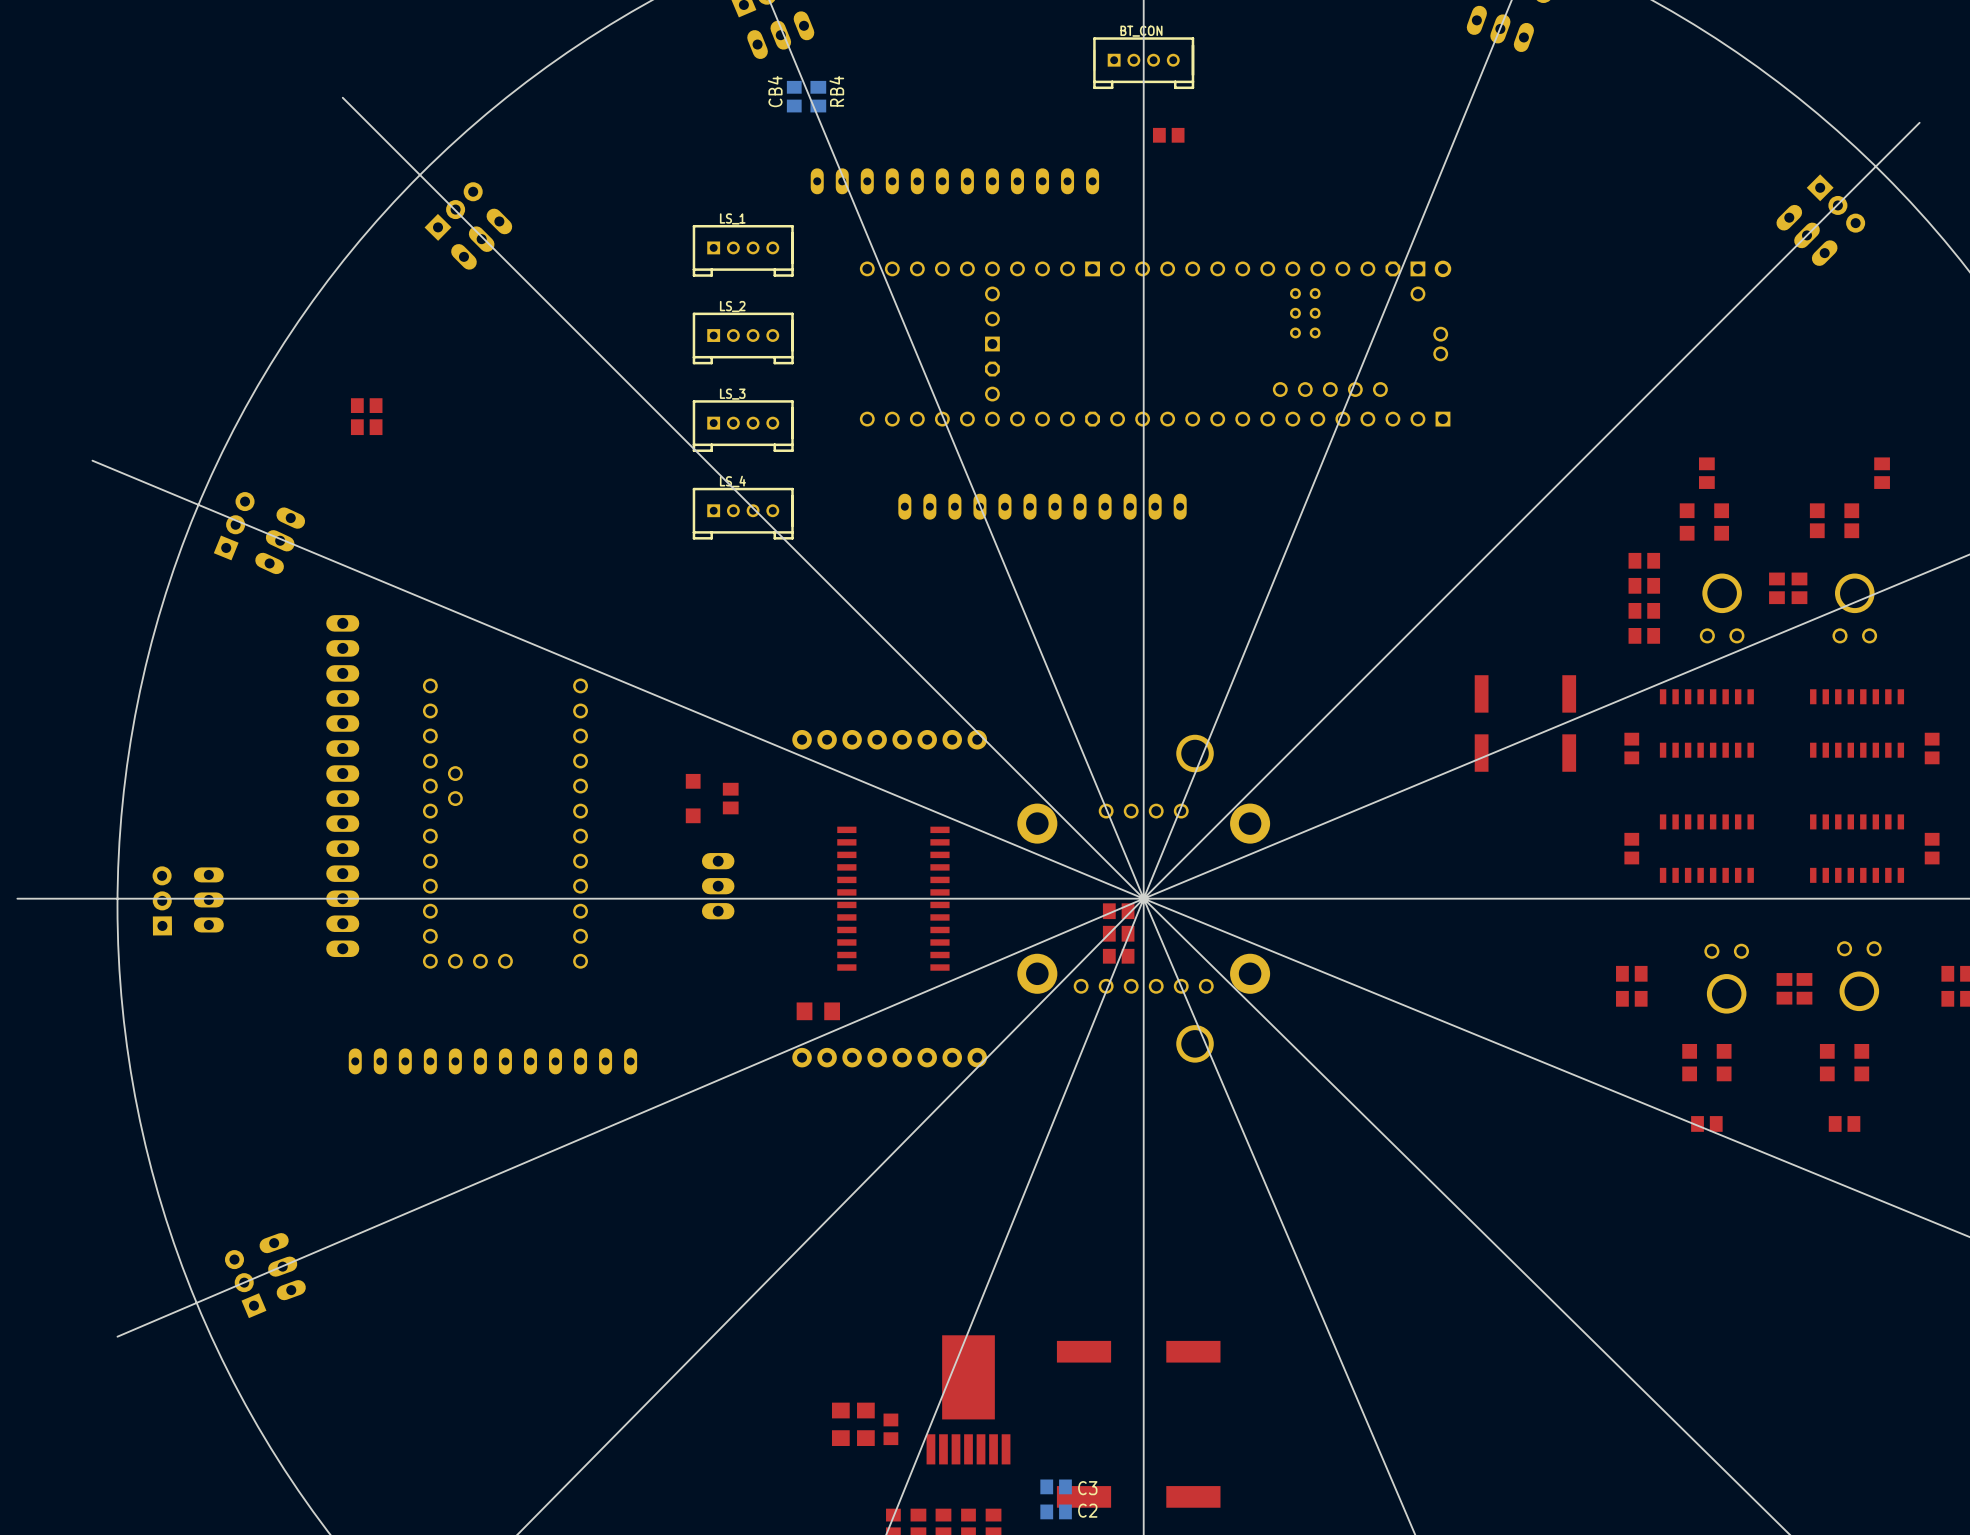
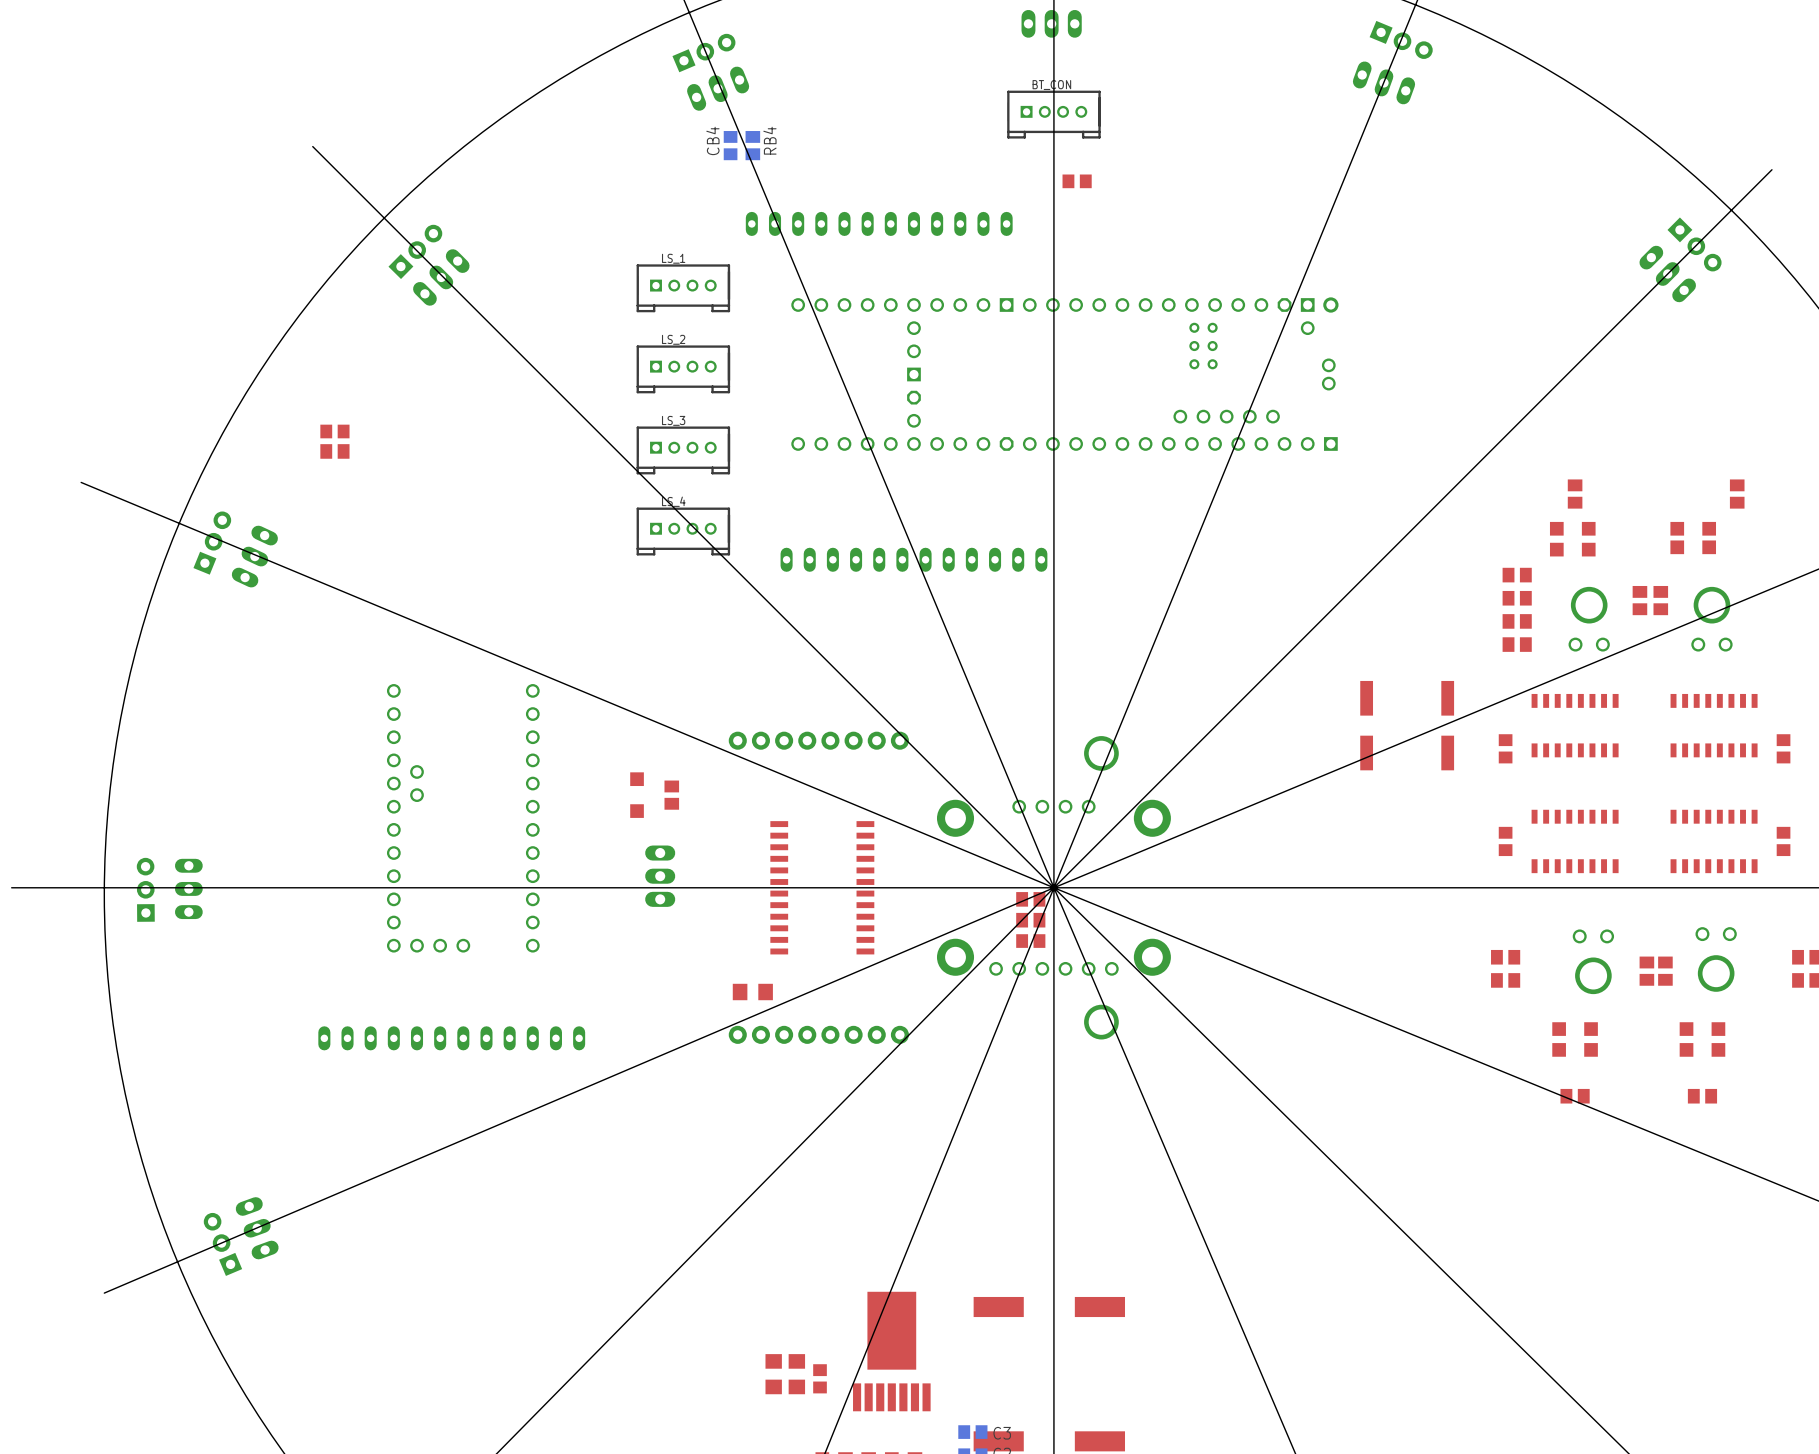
part position: (1042, 506) -> (913, 559)
part: (342, 786) -> none

